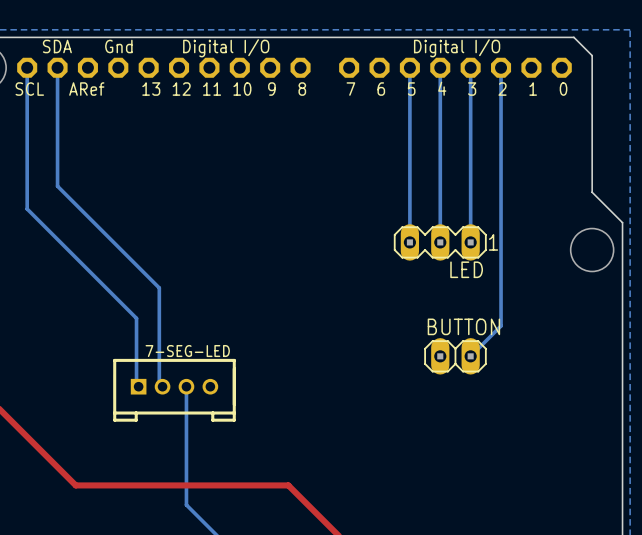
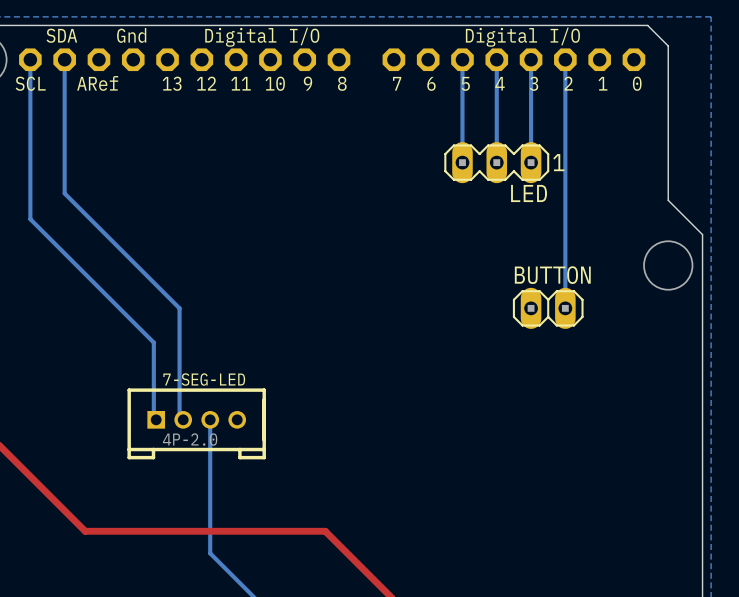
bottom track: (409, 158) (409, 242) -> none
bottom track: (440, 158) (440, 242) -> none
bottom track: (470, 158) (470, 242) -> none
LED position: (440, 242) -> (496, 162)
bottom track: (501, 287) (501, 325) (470, 356) -> none
BUTTON position: (455, 356) -> (548, 308)
7-SEG-LED value: none -> 4P-2.0 (190, 439)

